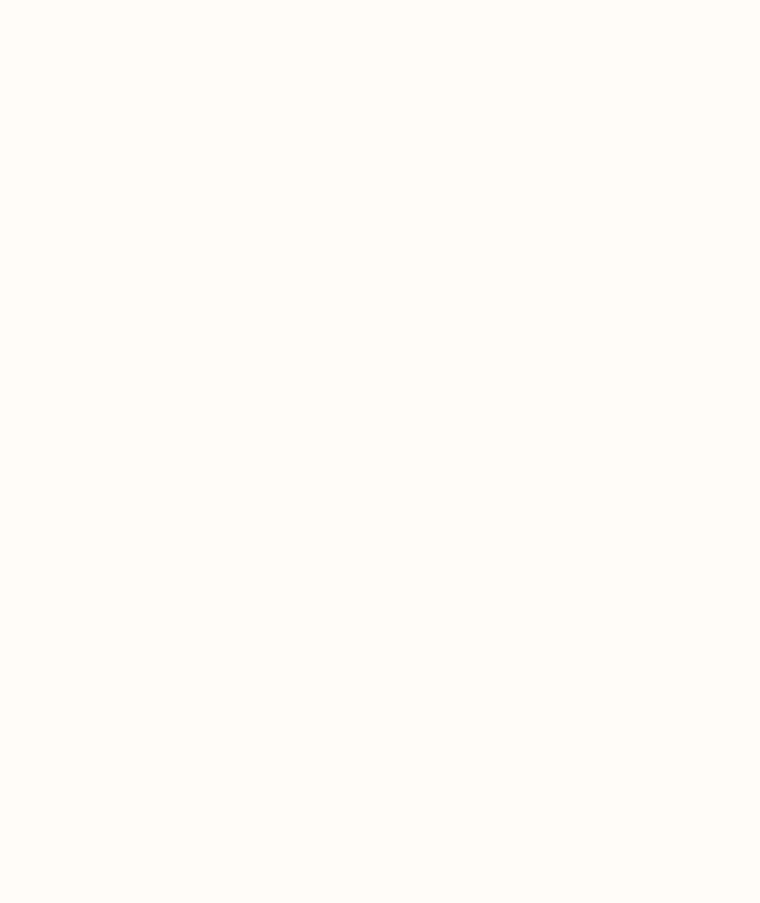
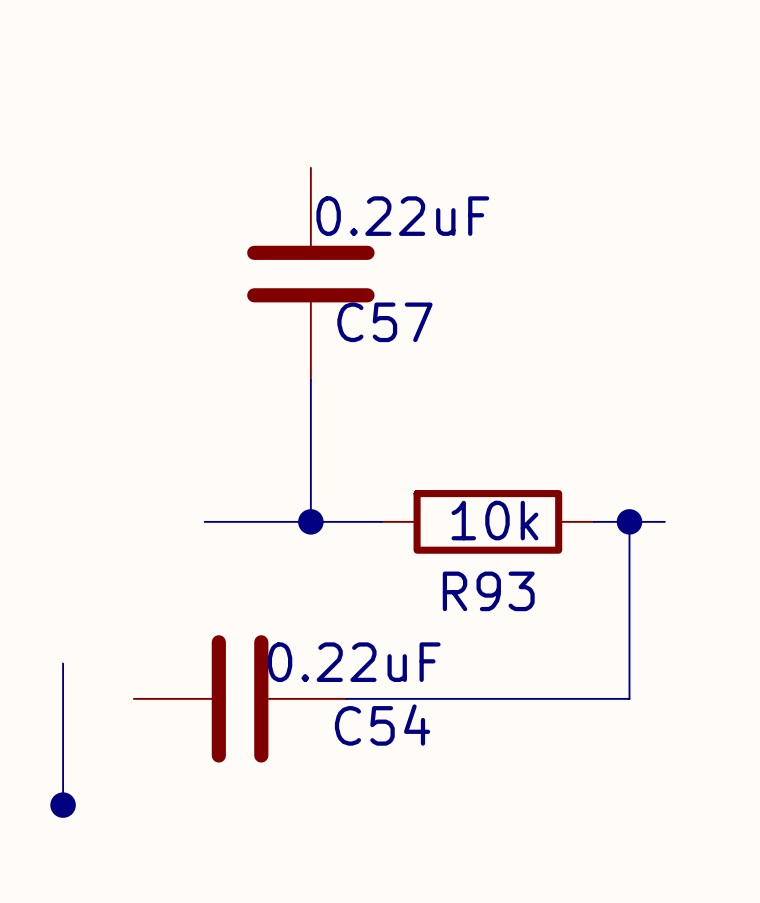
C57: none -> 0.22uF (310, 274)
wire: none -> (310, 380) (310, 521)
wire: none -> (204, 521) (381, 521)
junction: none -> (310, 521)
R93: none -> 10k (487, 521)
wire: none -> (594, 521) (664, 521)
wire: none -> (629, 521) (629, 698) (346, 698)
junction: none -> (629, 521)
wire: none -> (63, 663) (63, 805)
C54: none -> 0.22uF (240, 698)
junction: none -> (63, 805)

